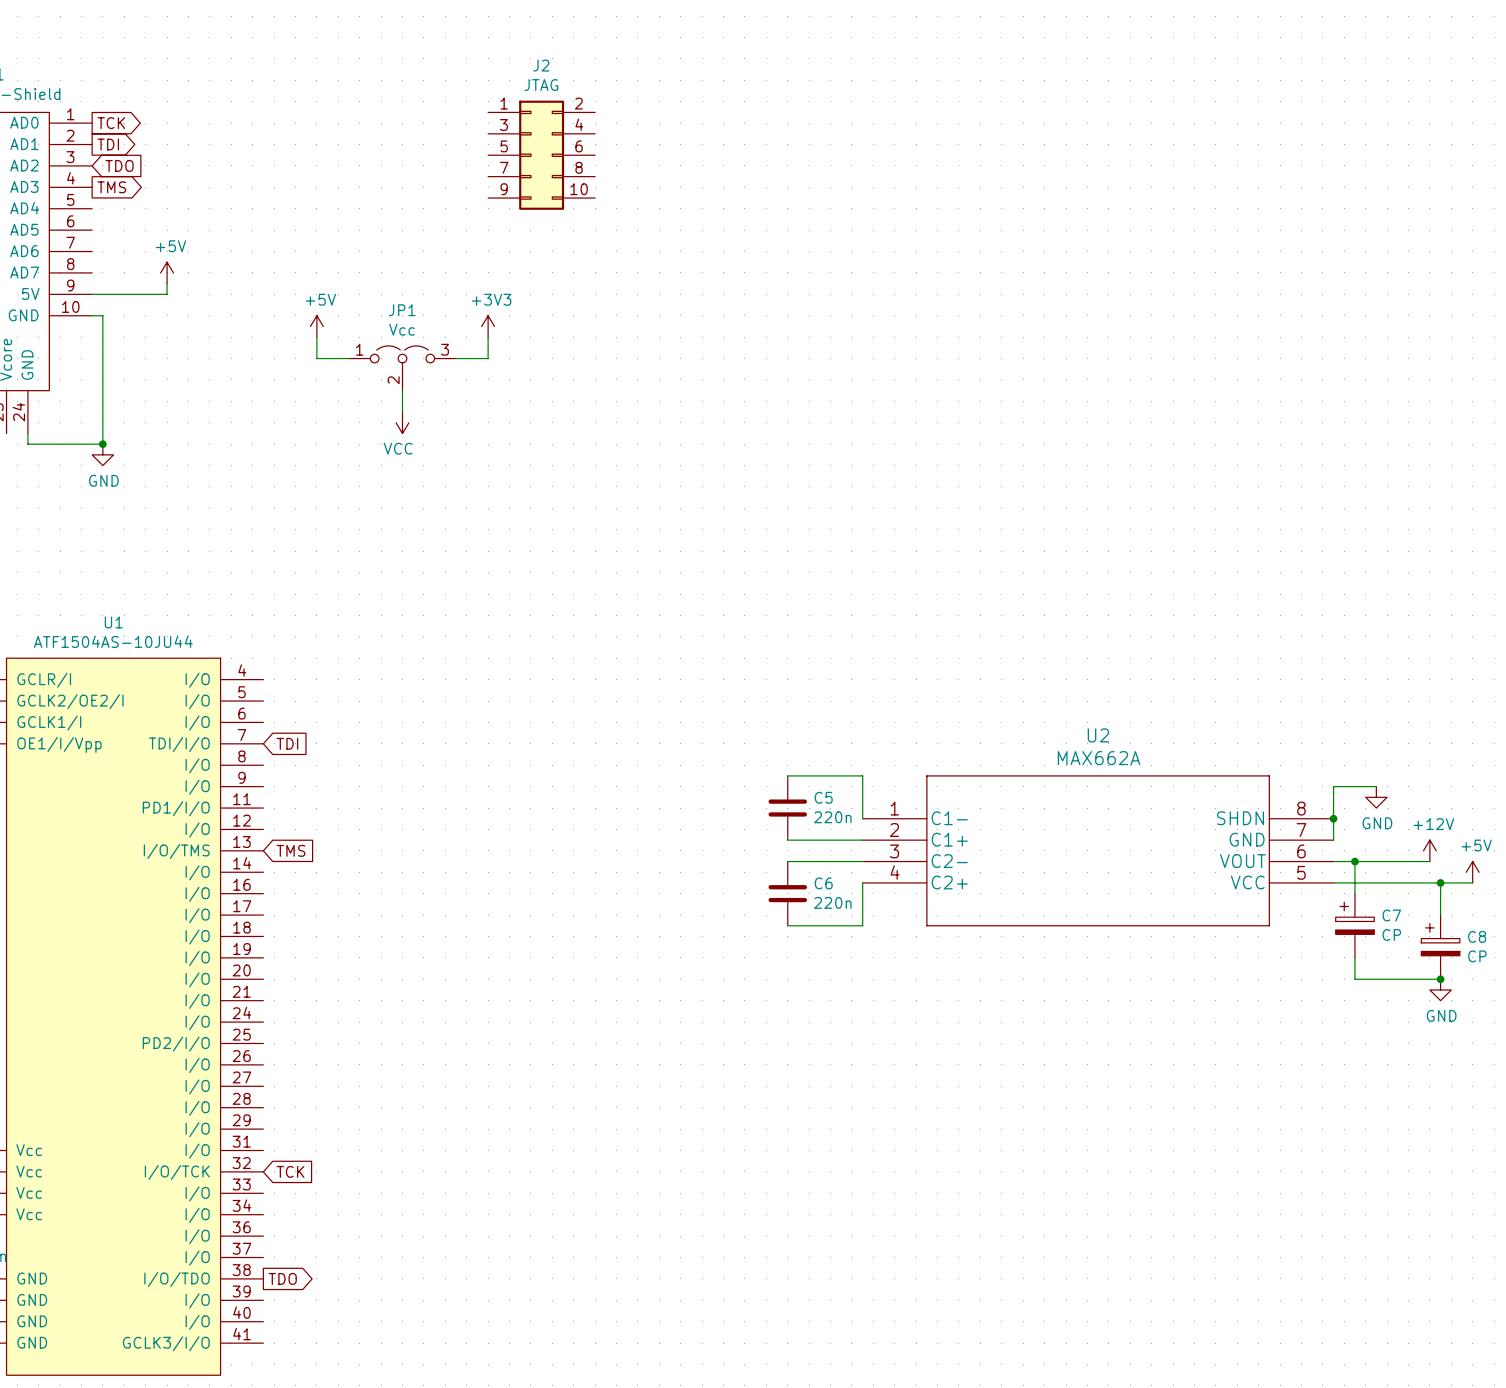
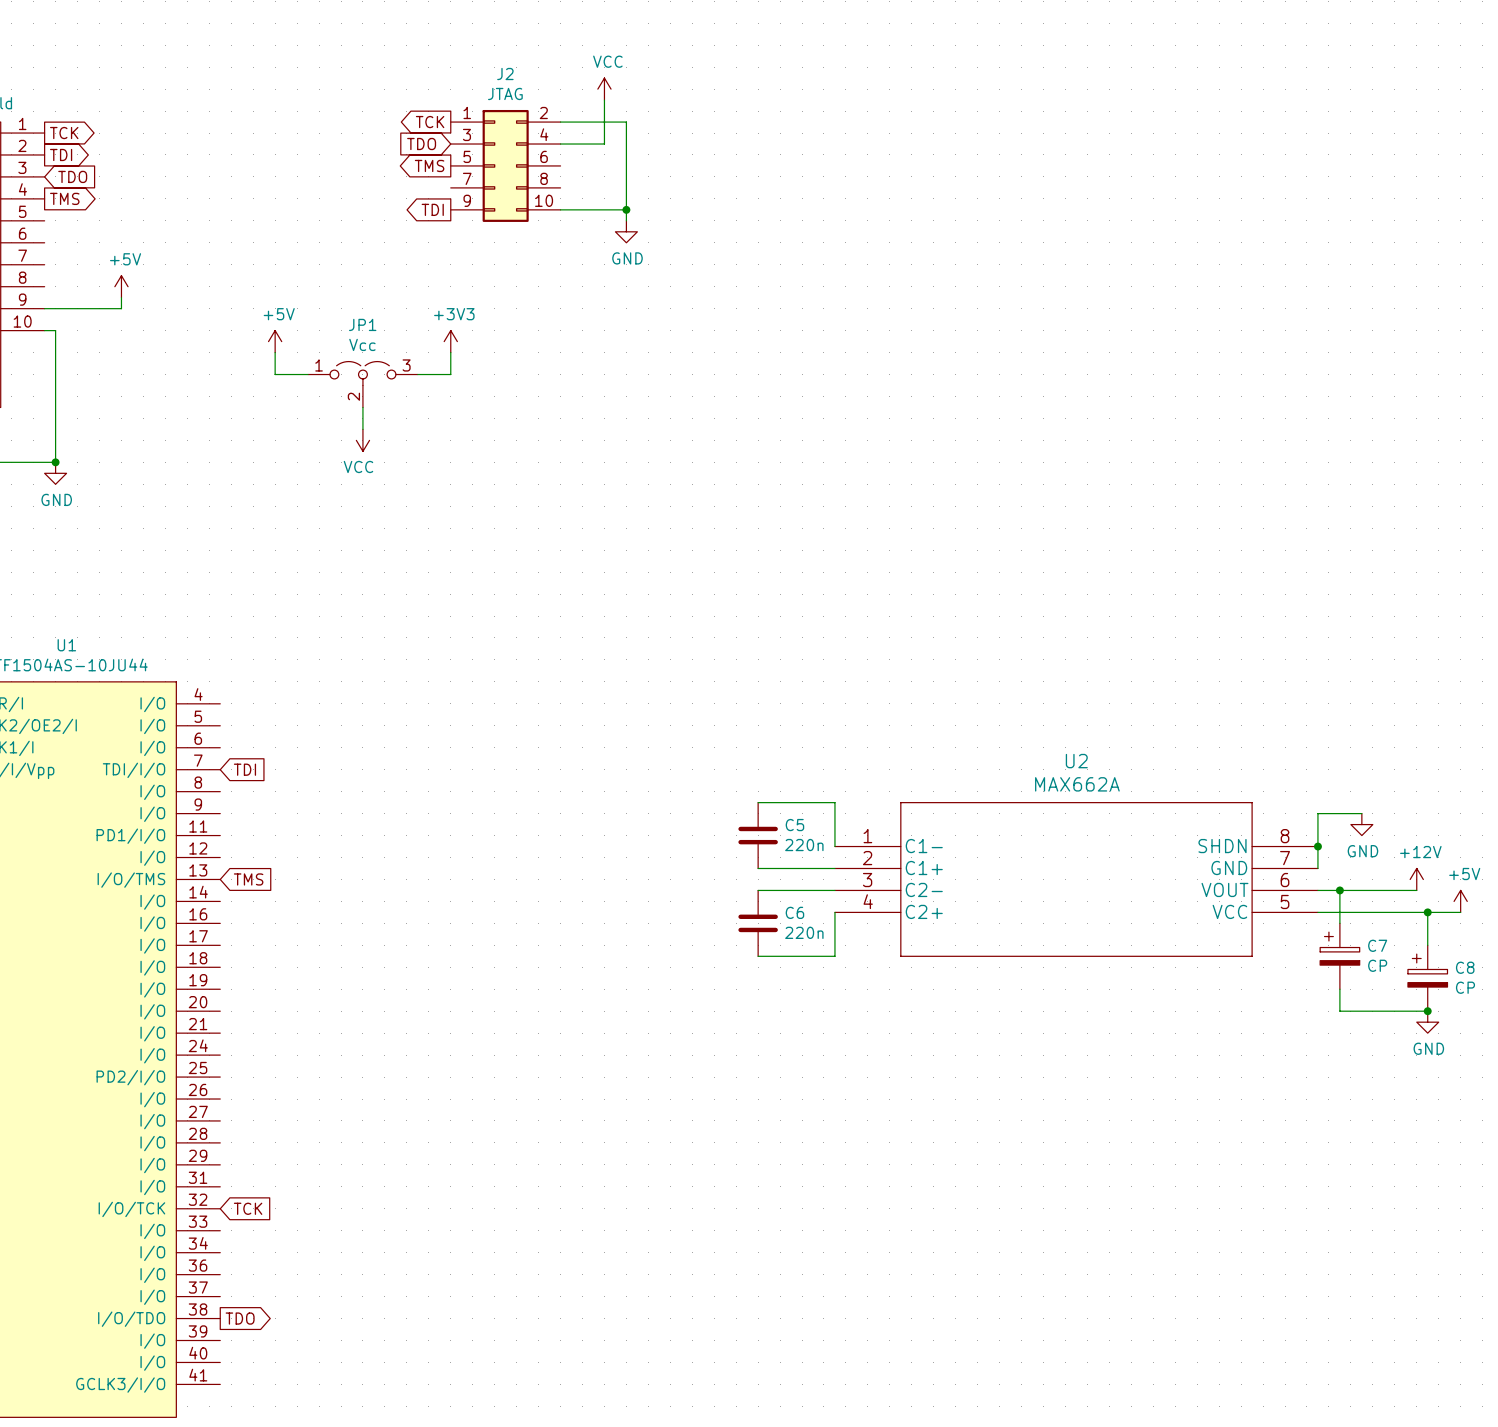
power symbol: none -> VCC (604, 89)
wire: none -> (604, 100) (604, 144) (560, 144)
global label: none -> TCK (430, 122)
wire: none -> (560, 122) (626, 122) (626, 220)
global label: none -> TDO (421, 144)
global label: none -> TMS (429, 165)
global label: none -> TDI (432, 209)
wire: none -> (560, 209) (626, 209)
junction: none -> (626, 209)
power symbol: none -> GND (626, 231)

